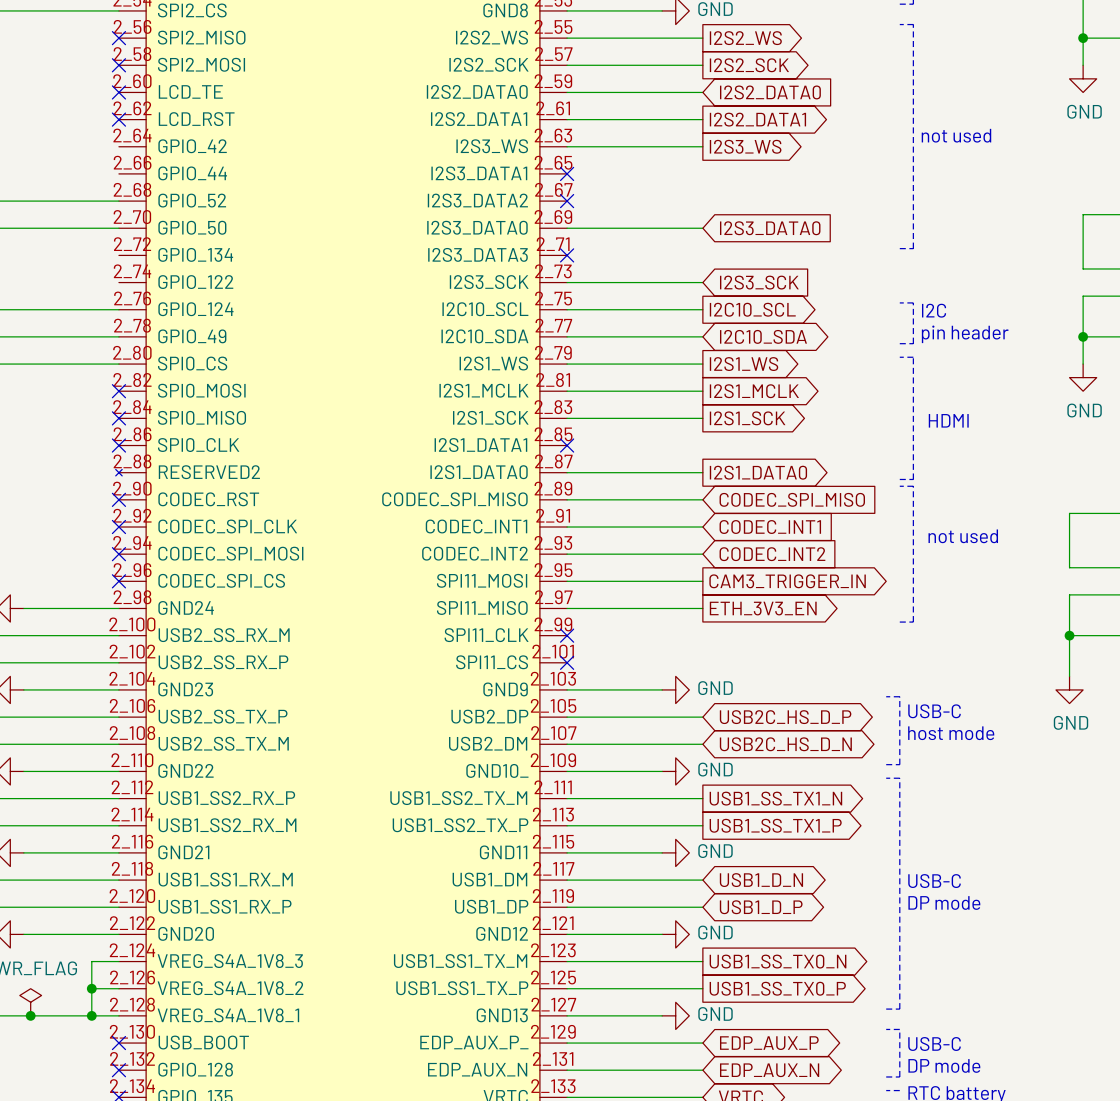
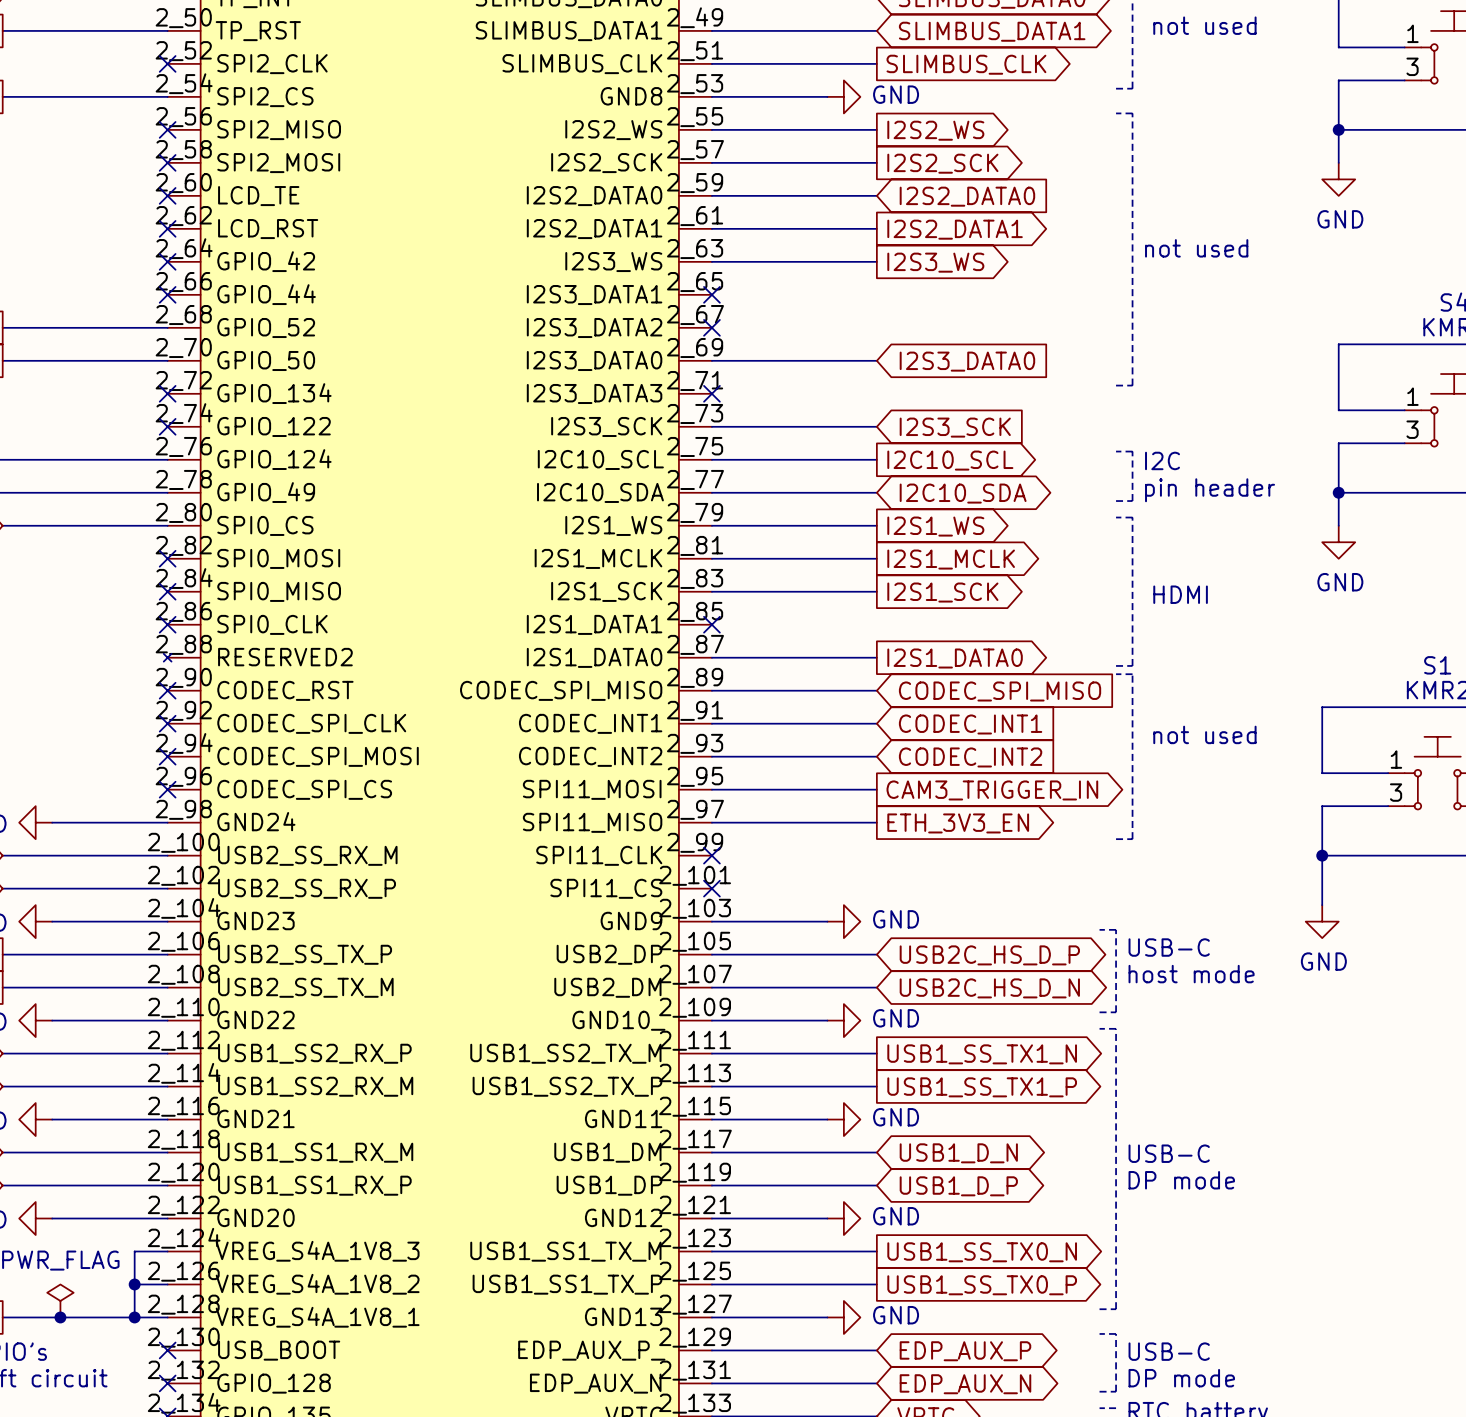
no-connect mark: none -> (167, 261)
no-connect mark: none -> (167, 294)
no-connect mark: none -> (167, 393)
no-connect mark: none -> (167, 426)

